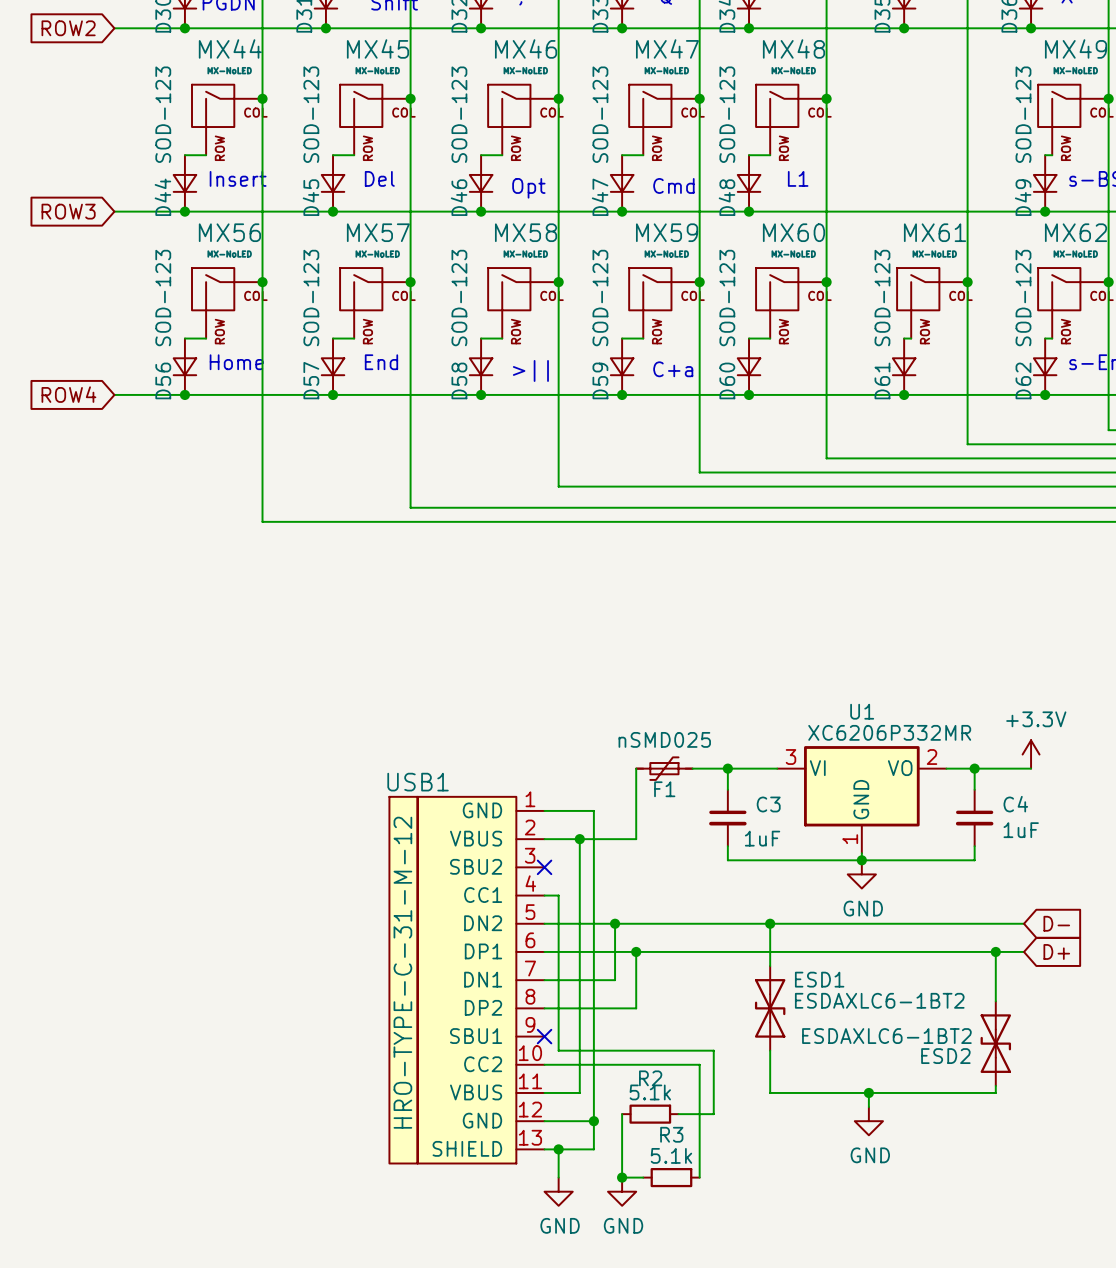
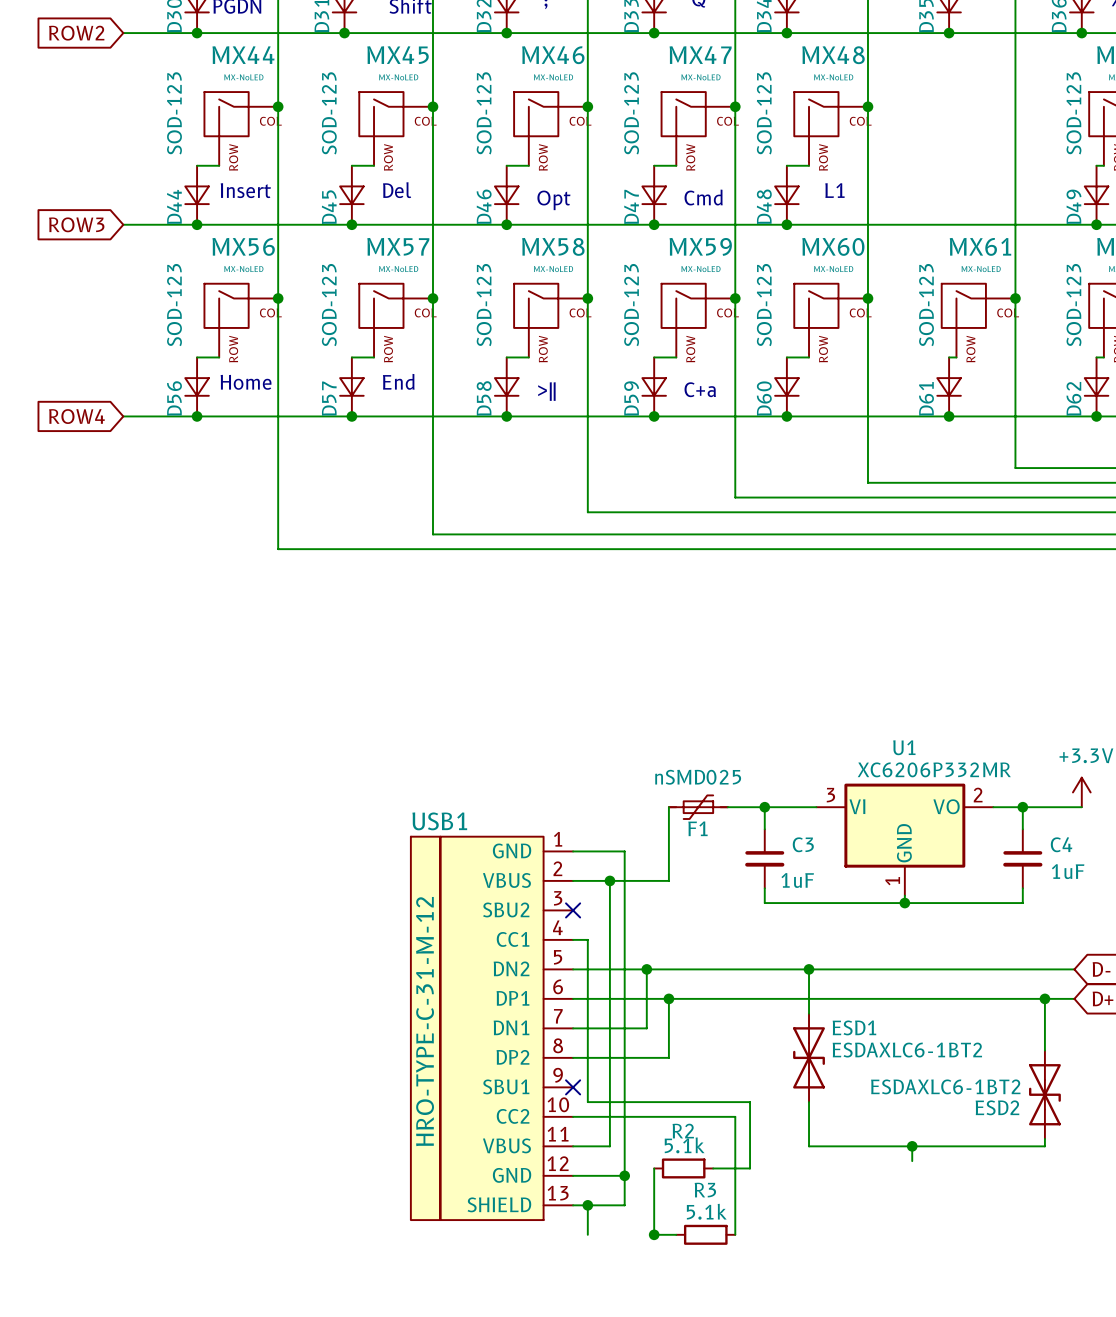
power symbol: GND (861, 874) -> none
power symbol: GND (868, 1121) -> none
power symbol: GND (558, 1191) -> none
power symbol: GND (622, 1191) -> none

